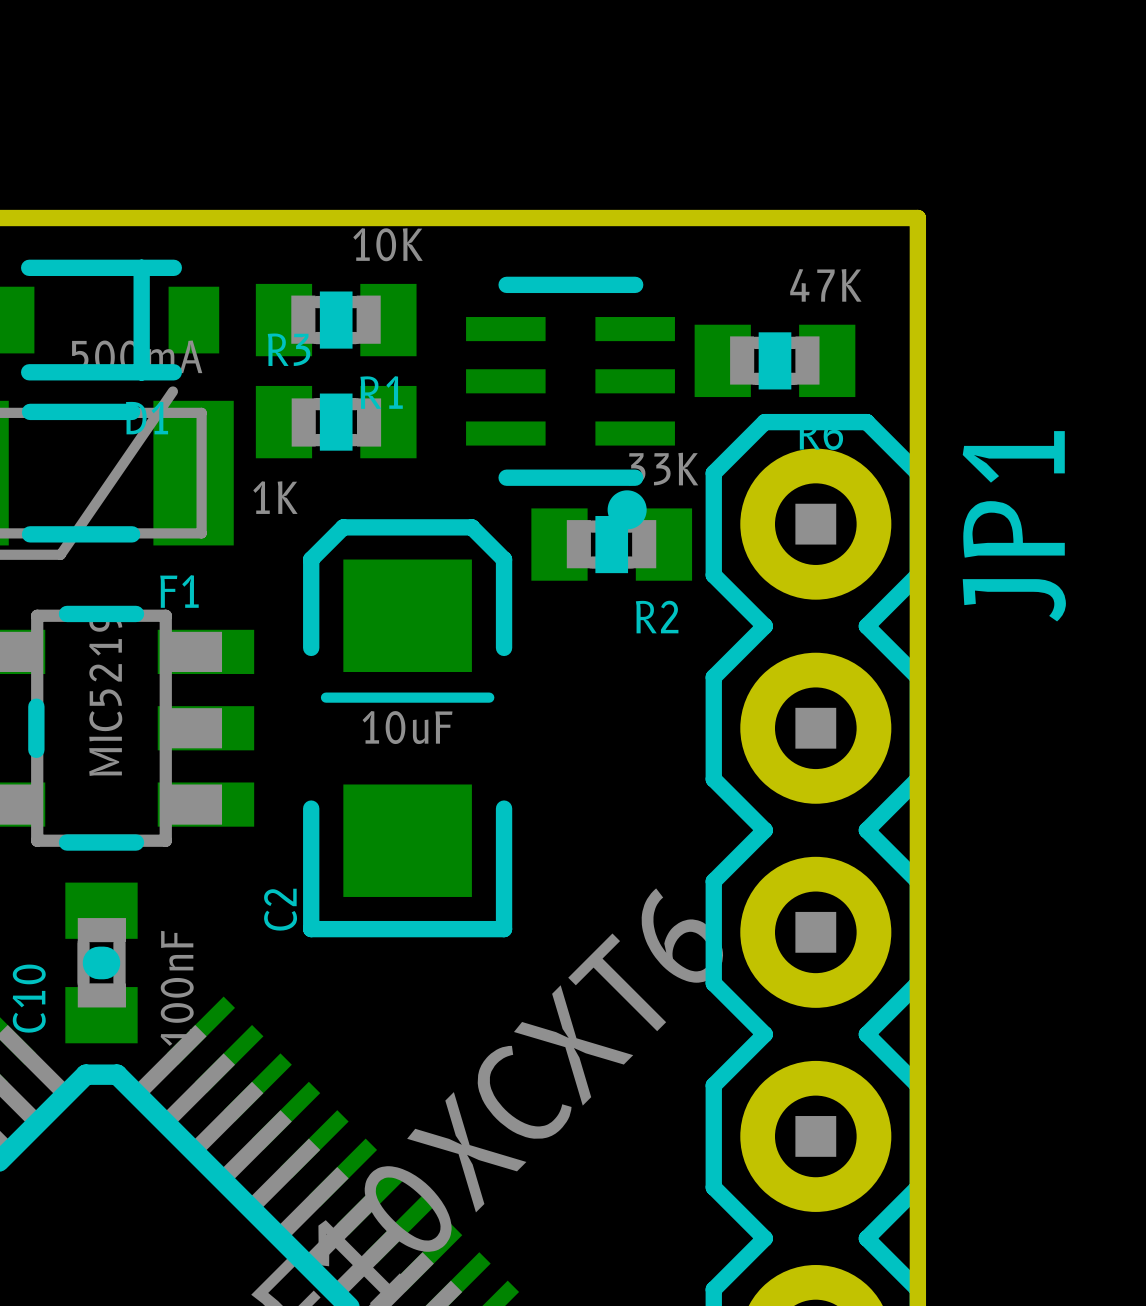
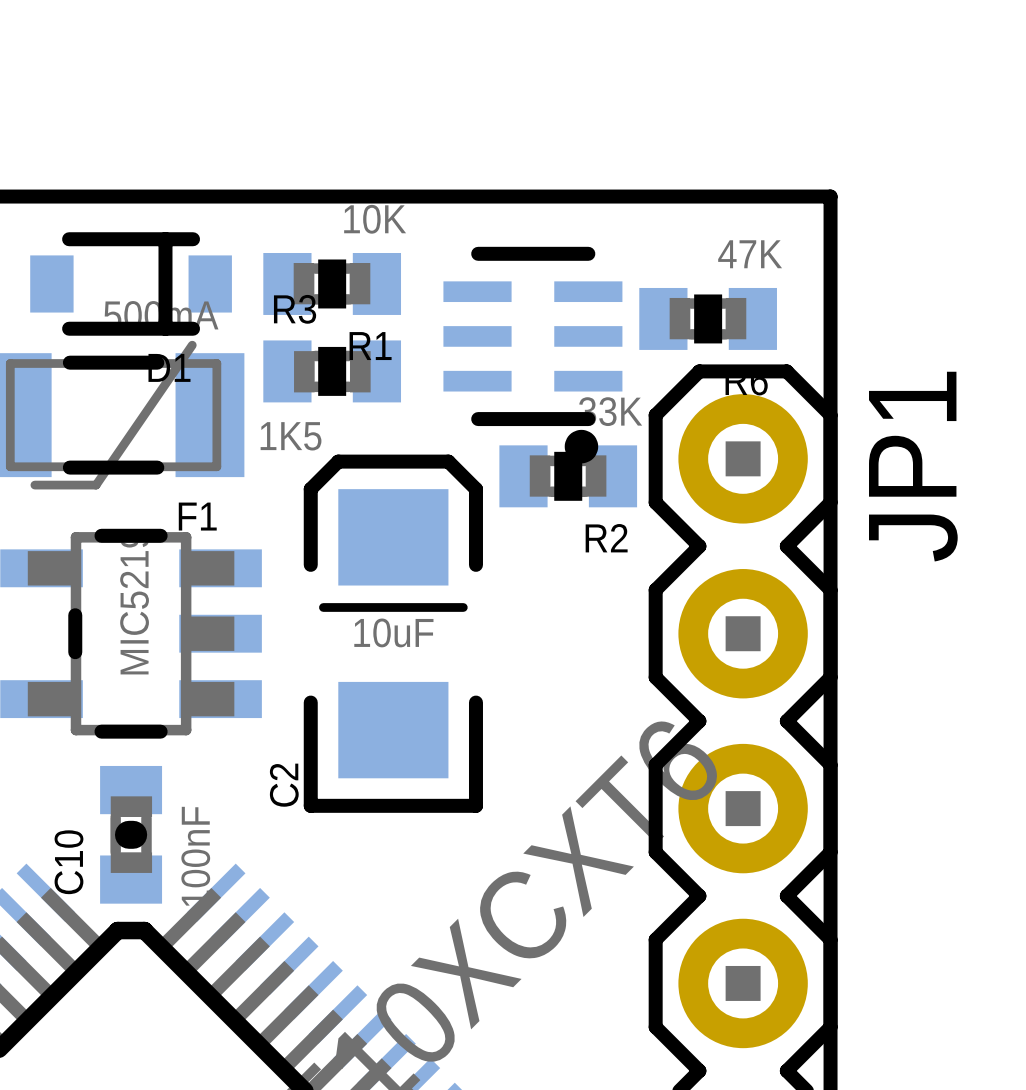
R3 value: 1K (275, 497) -> 1K5 (291, 436)

